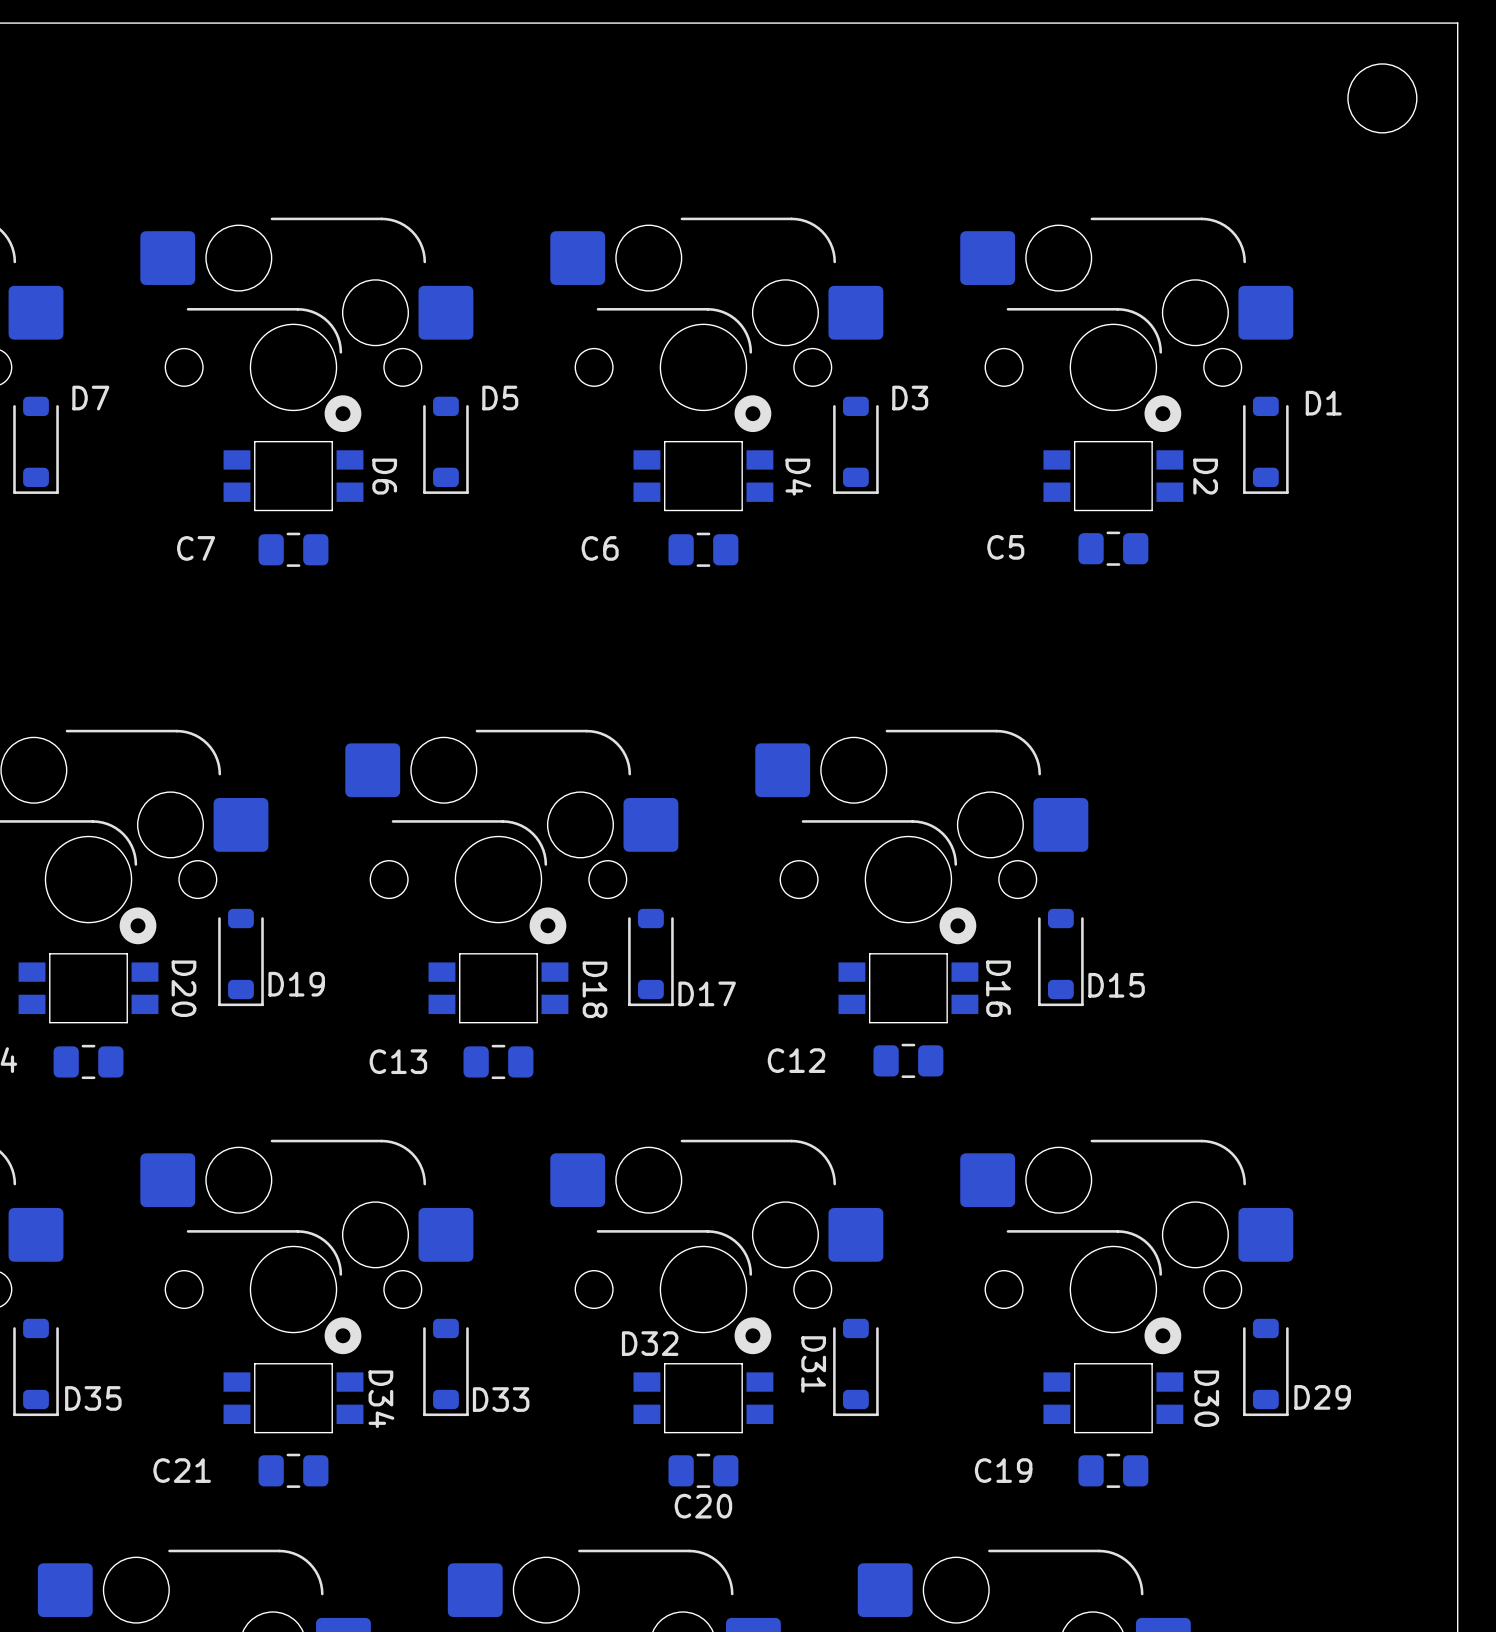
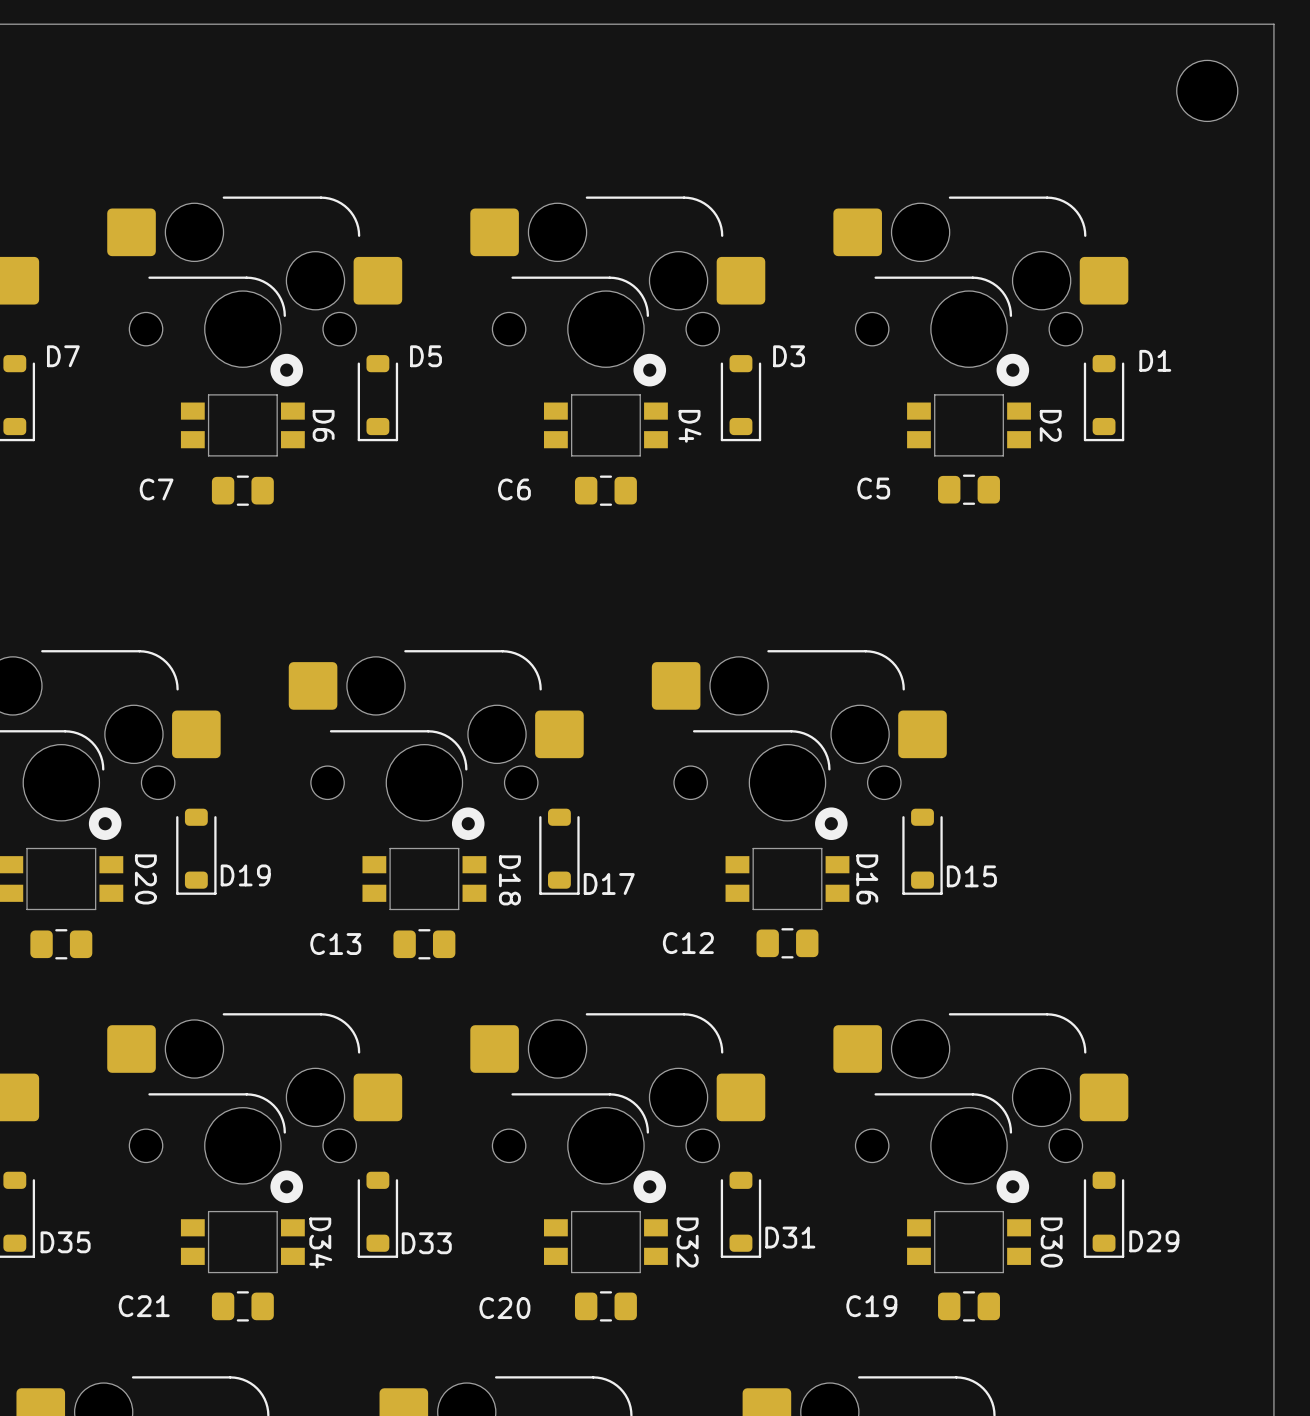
D32 name rotation: 0° (650, 1343) -> 90° clockwise (687, 1242)
D32 name position: D32 (650, 1343) -> D32 (687, 1242)
D31 name rotation: 0° (813, 1364) -> 90° counterclockwise (790, 1237)
D31 name position: D31 (813, 1364) -> D31 (790, 1237)
C20 name position: C20 (703, 1506) -> C20 (504, 1308)

